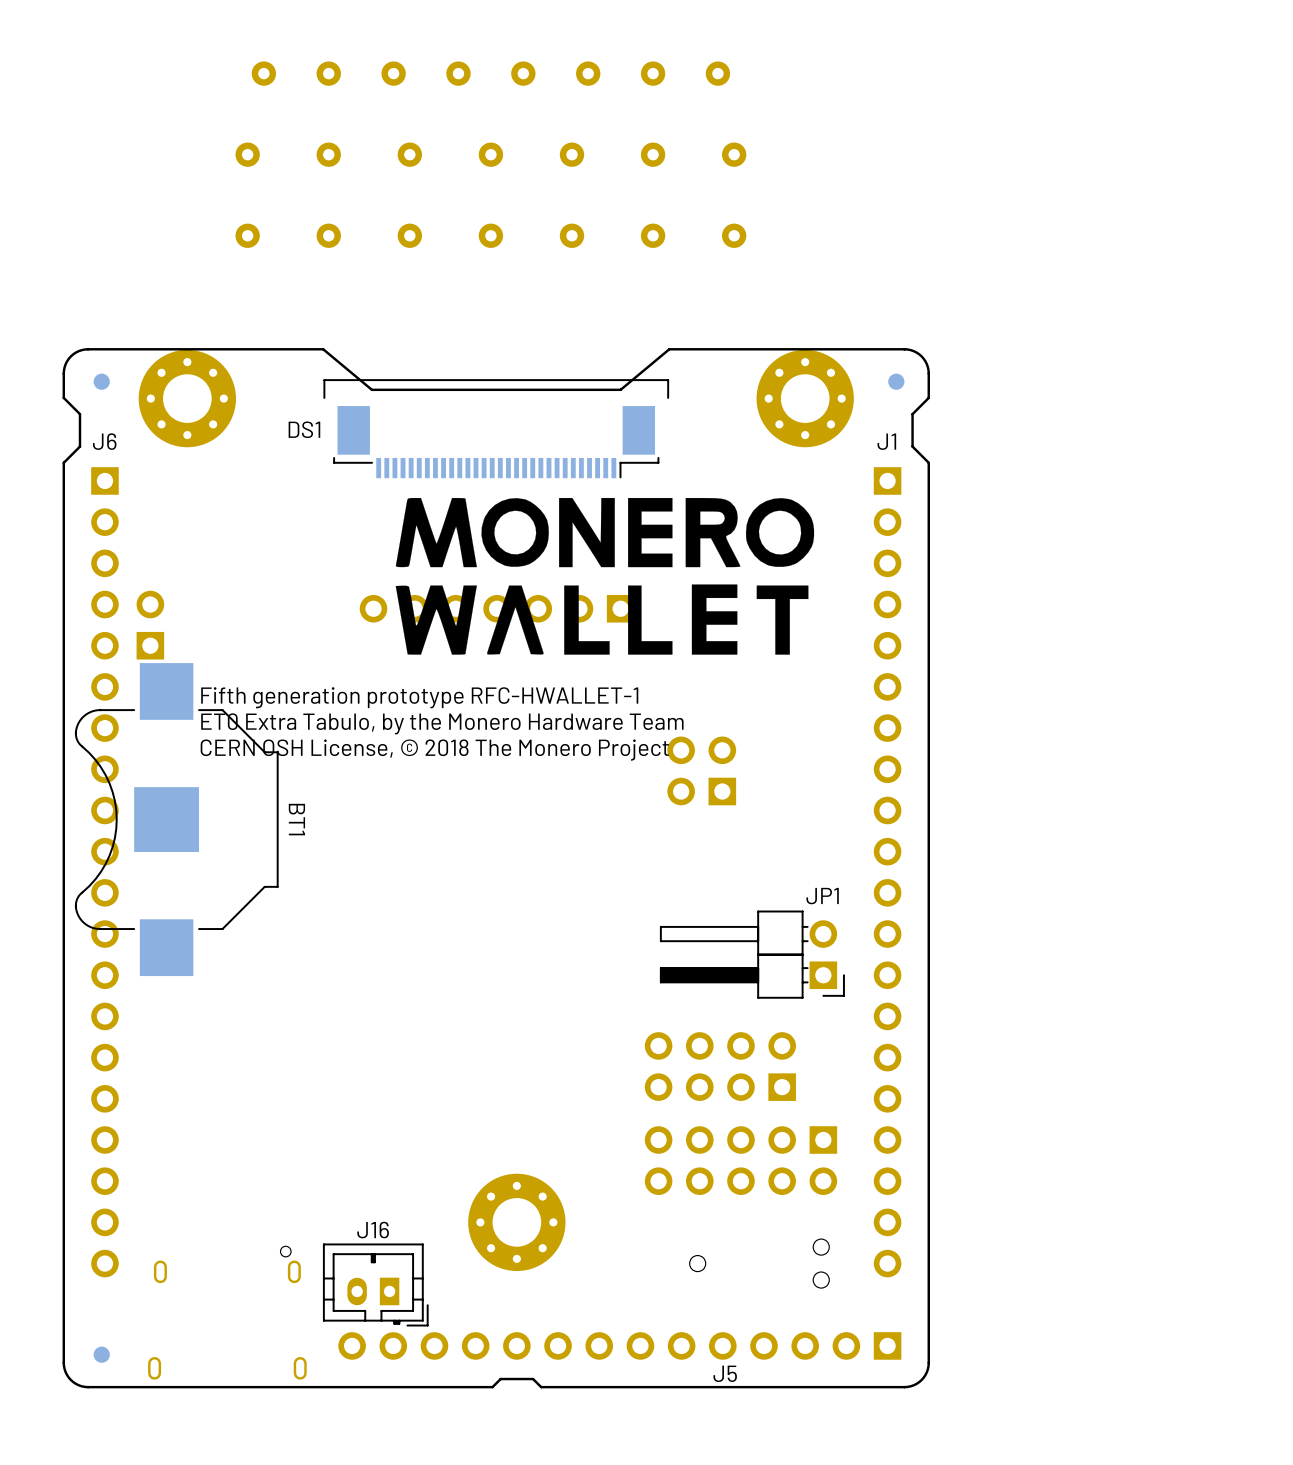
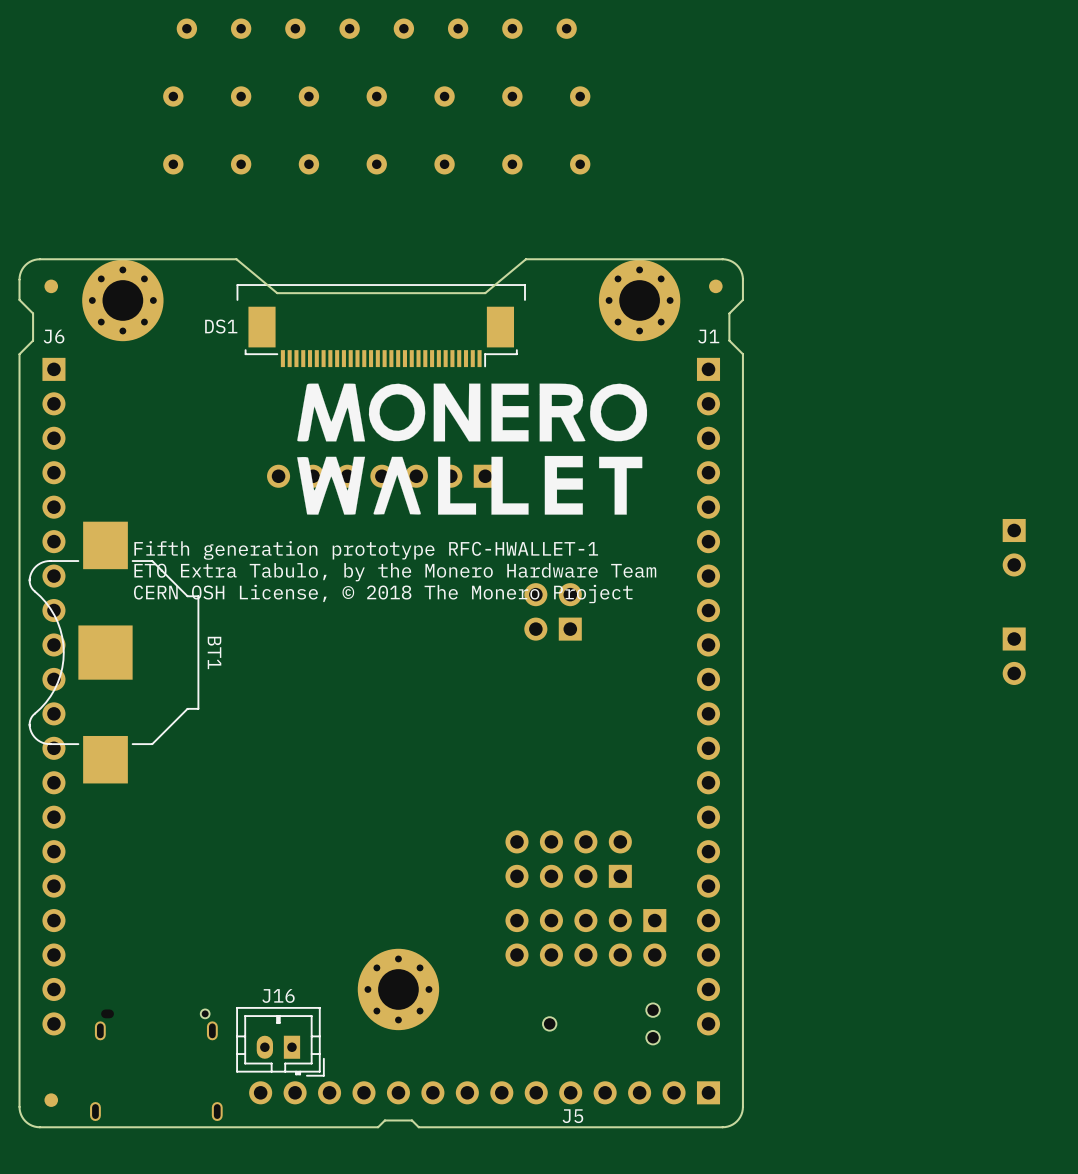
part: (150, 625) -> none
part: none -> (1014, 547)
part: none -> (1014, 656)
JP1: (752, 954) -> none

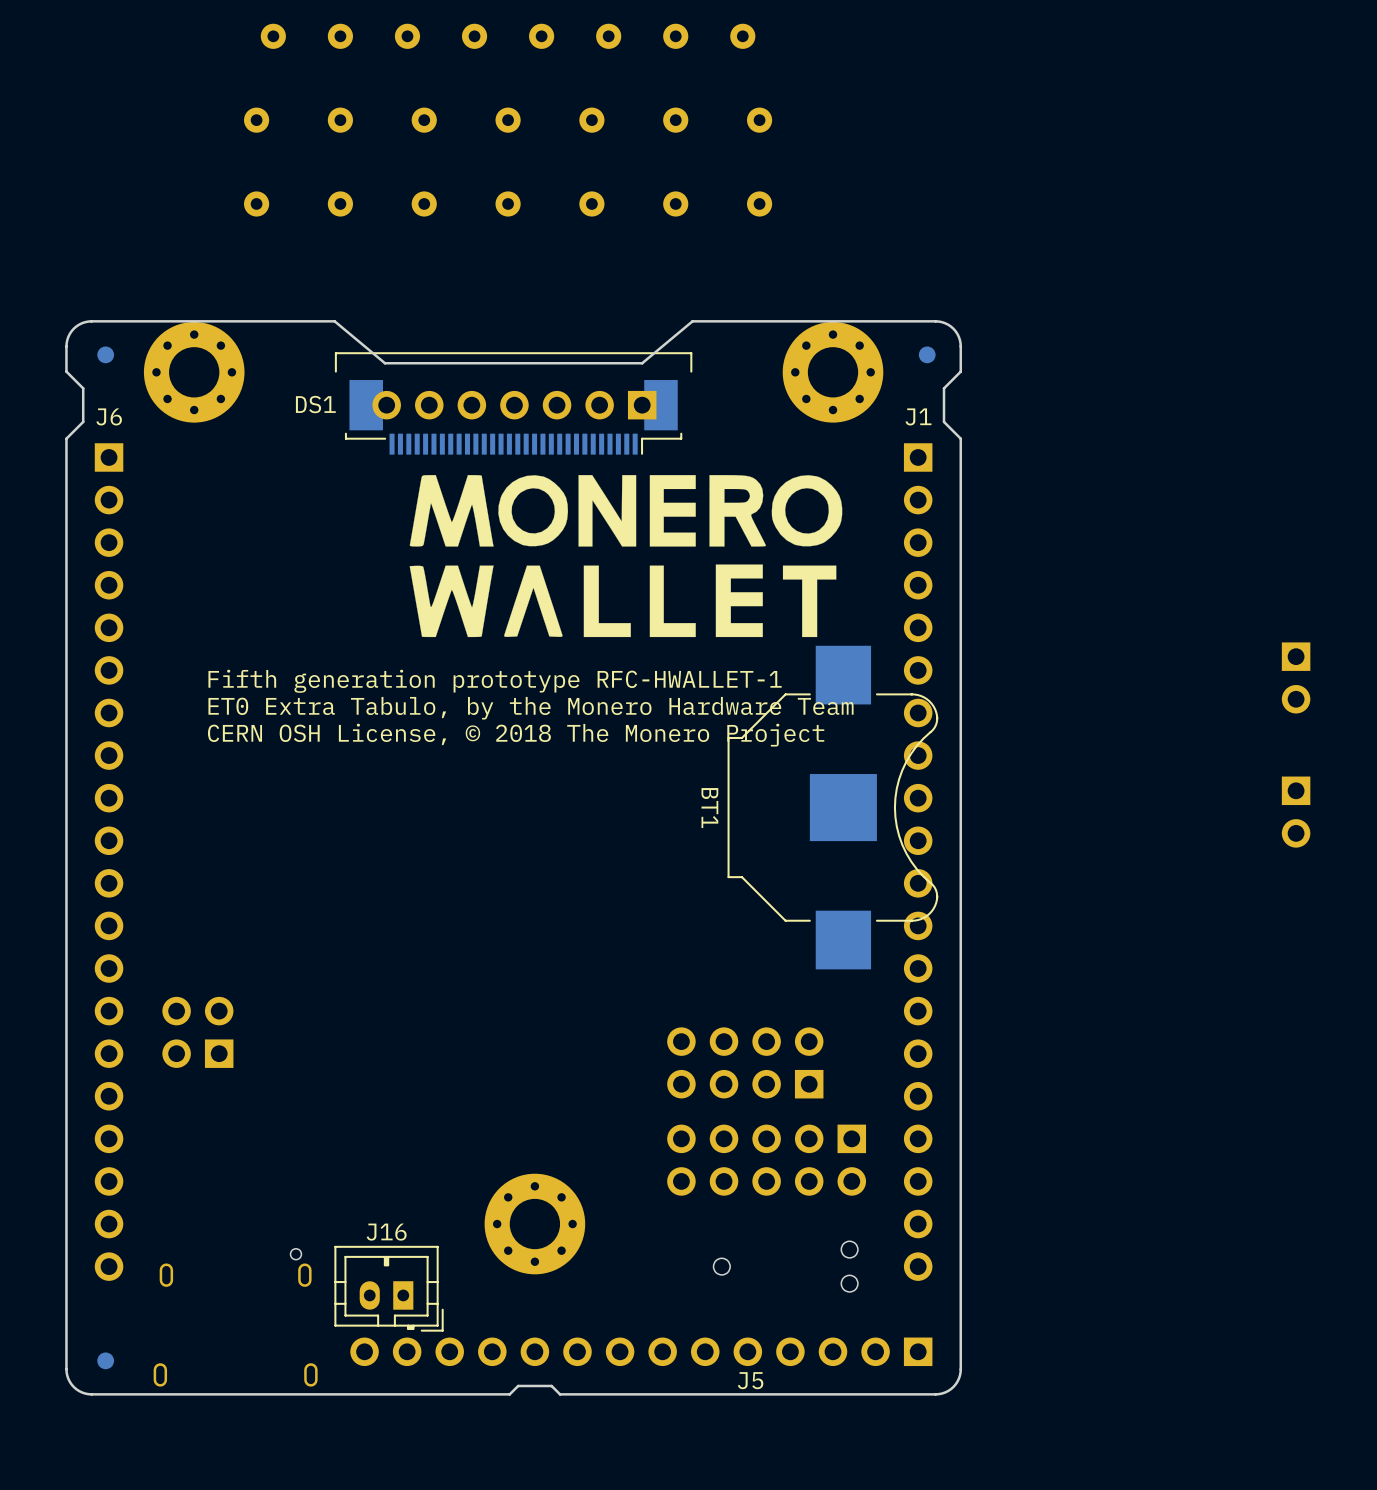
part position: (381, 476) -> (514, 405)
part: (553, 611) -> none
BT1 rotation: 0° (113, 652) -> 180° (832, 807)
BT1 position: (113, 652) -> (832, 807)
part: none -> (197, 1032)

